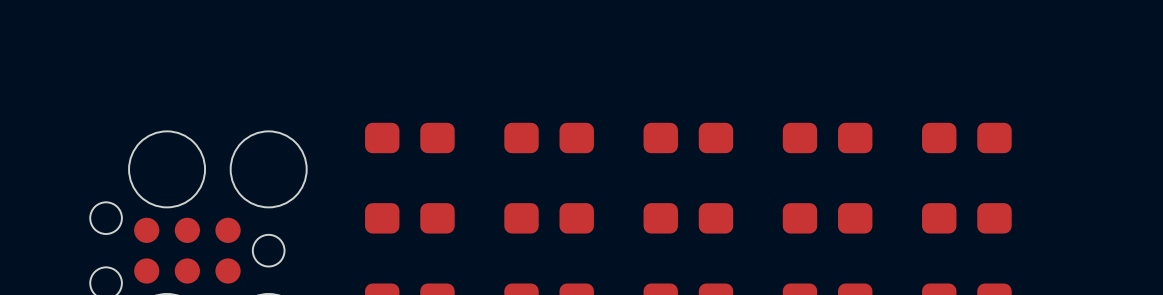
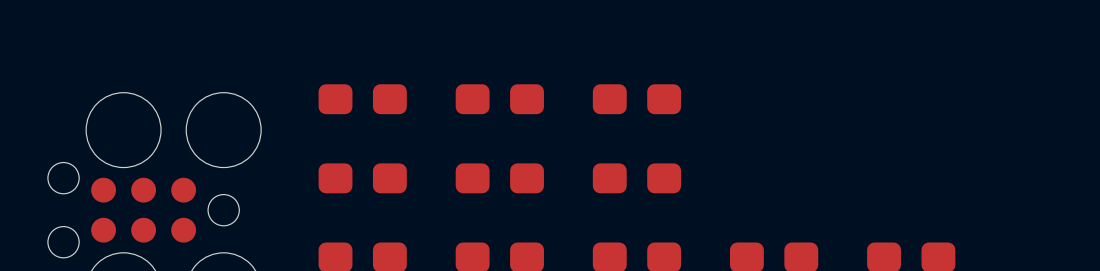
part: (827, 137) -> none
part: (966, 137) -> none
part: (827, 218) -> none
part: (966, 218) -> none

